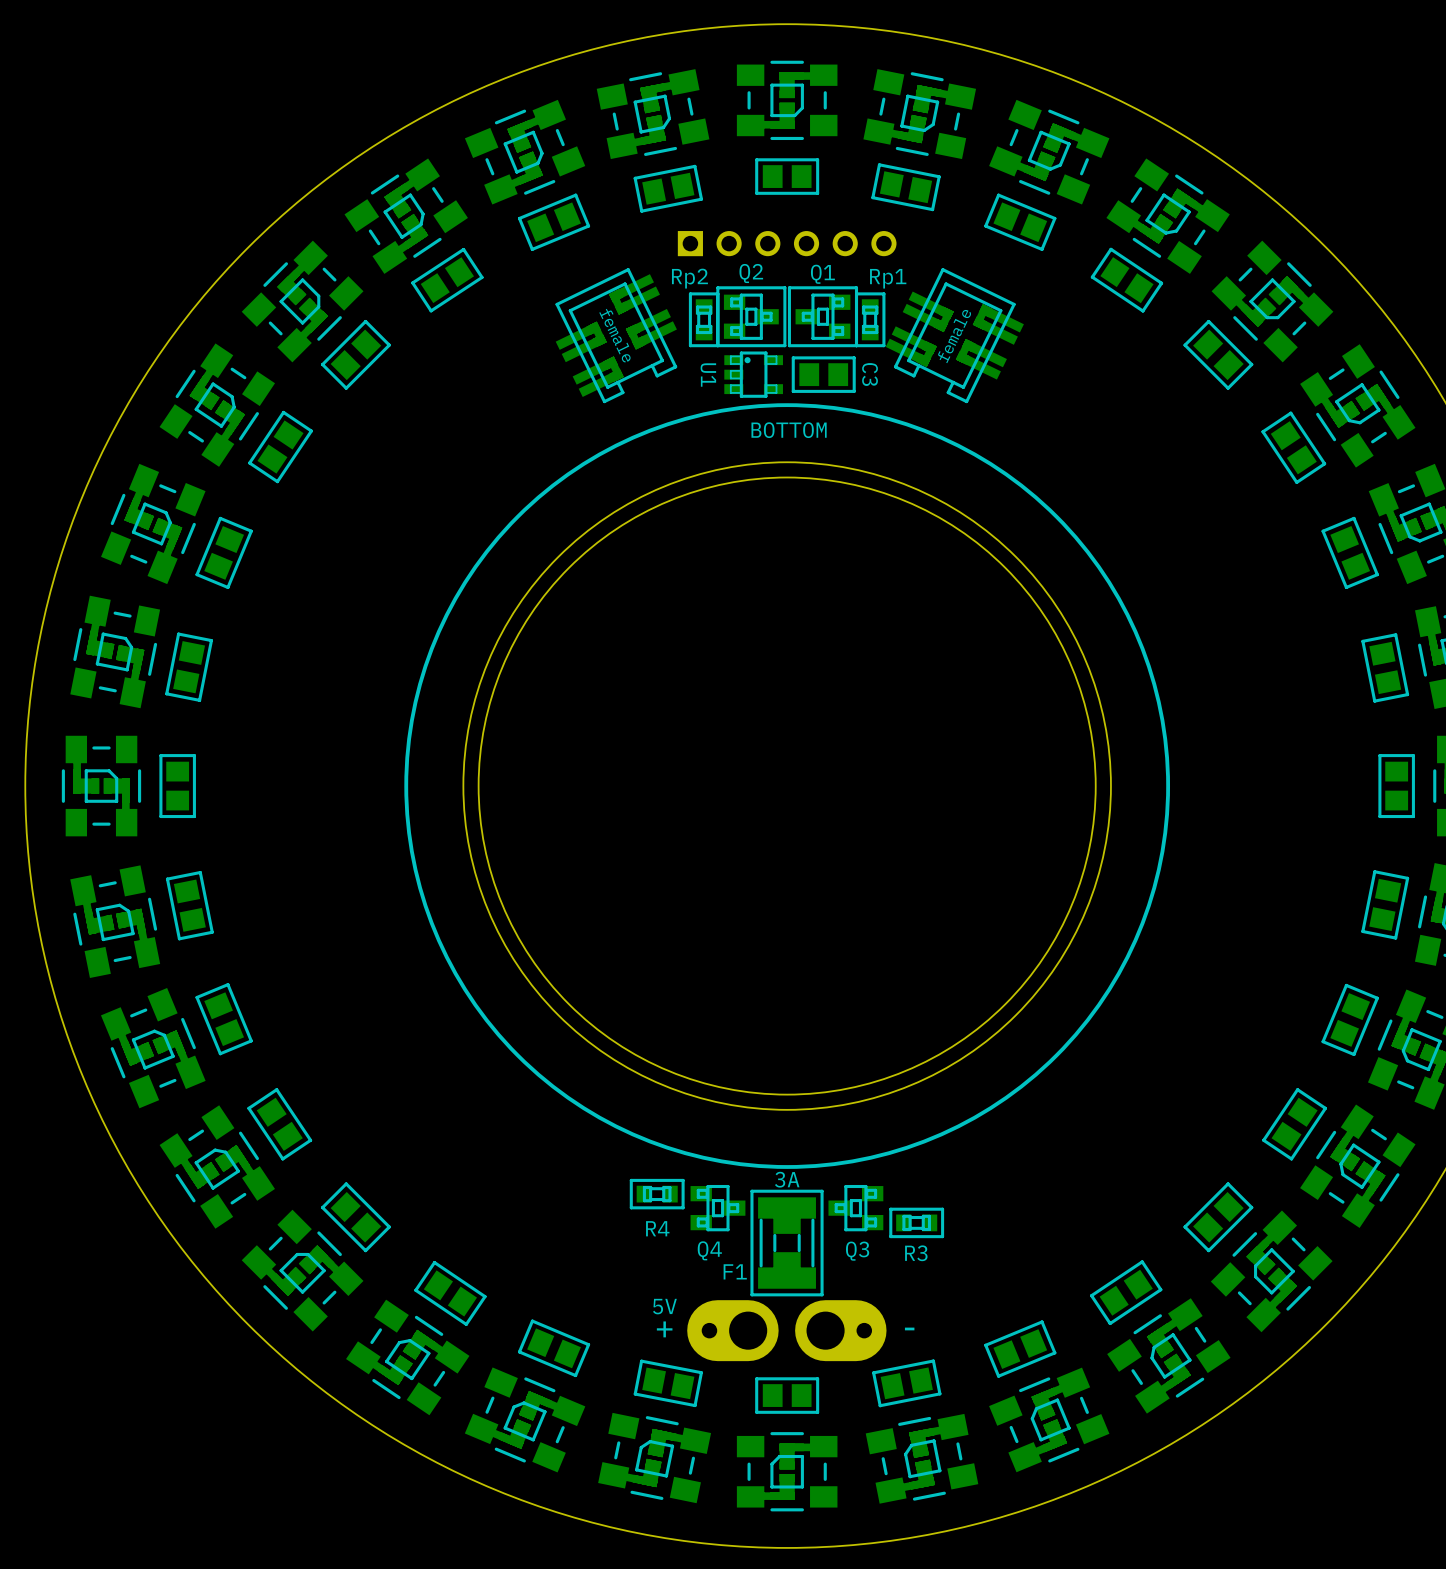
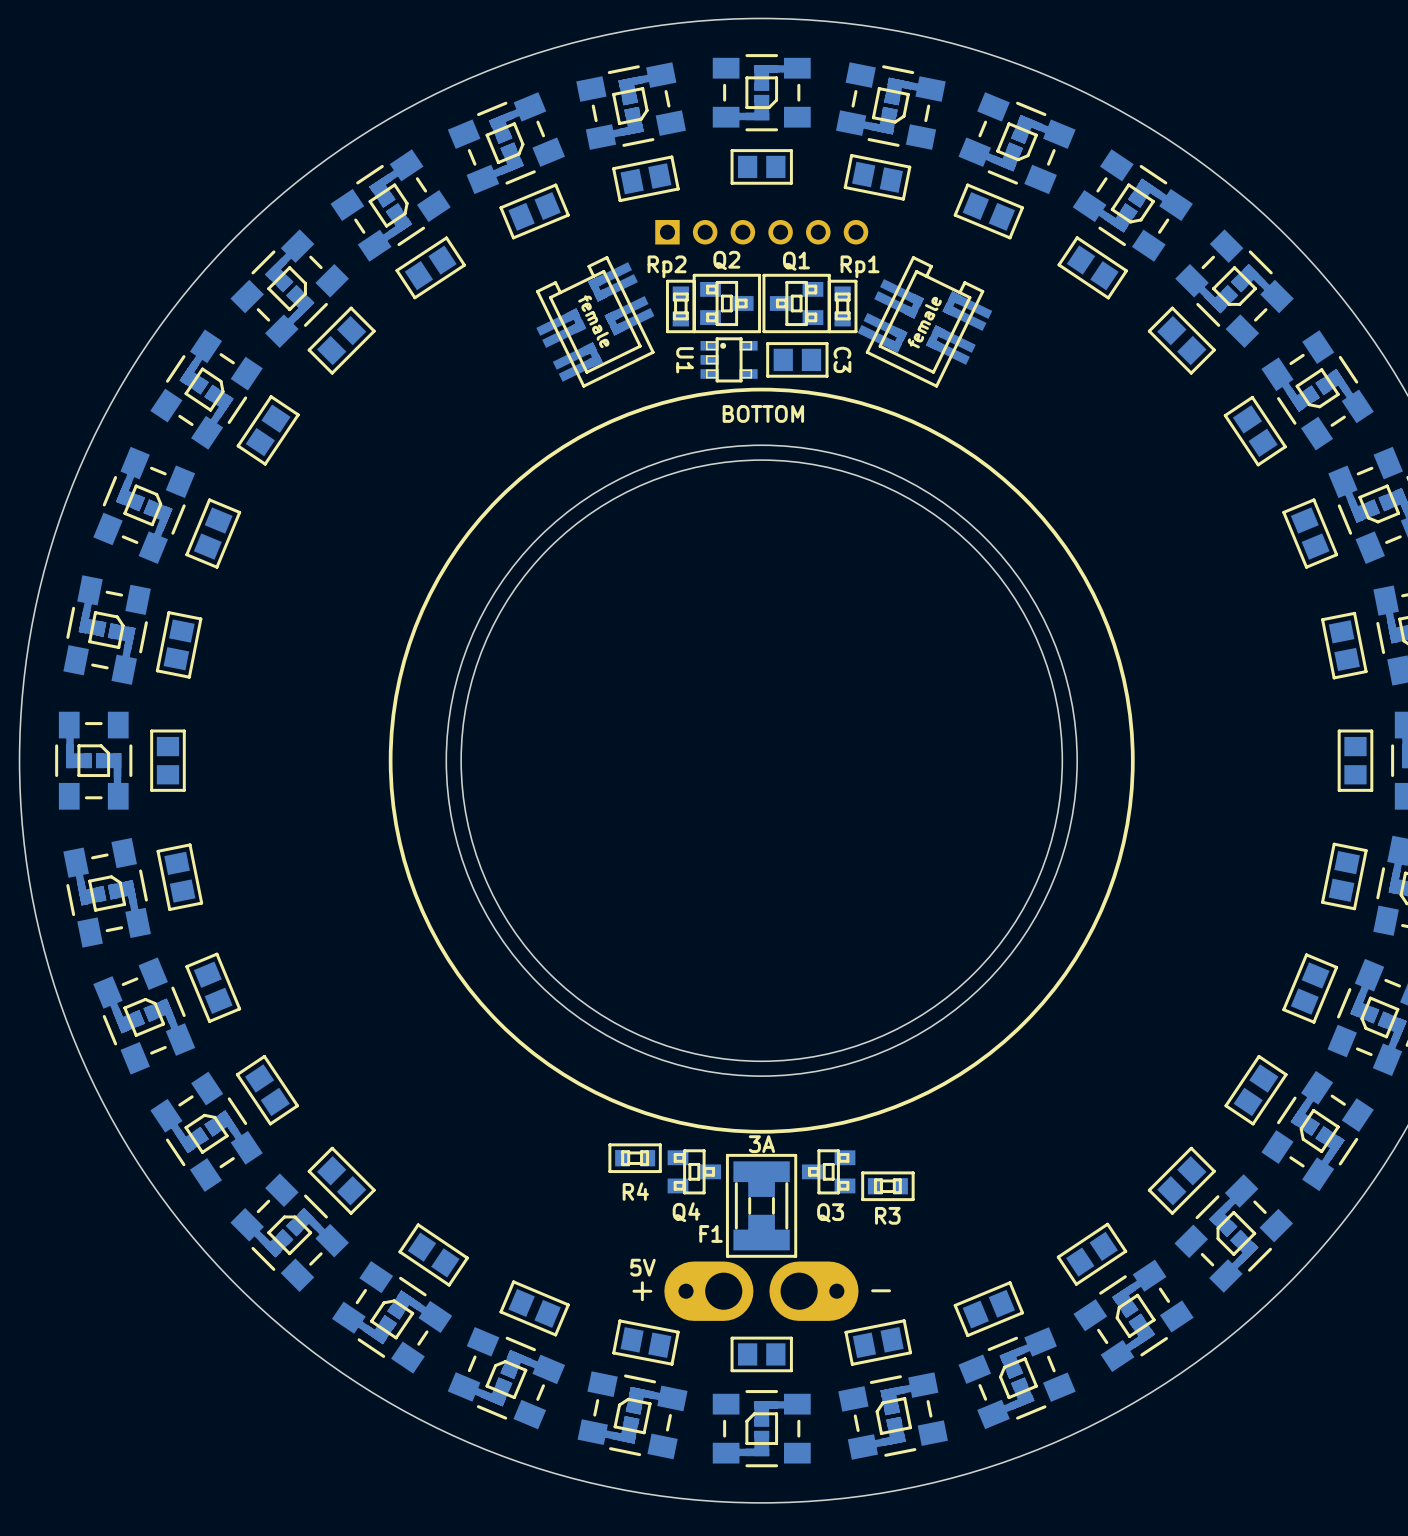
part rotation: 0° (616, 335) -> 180° (595, 321)
part rotation: 0° (954, 335) -> 180° (924, 321)

